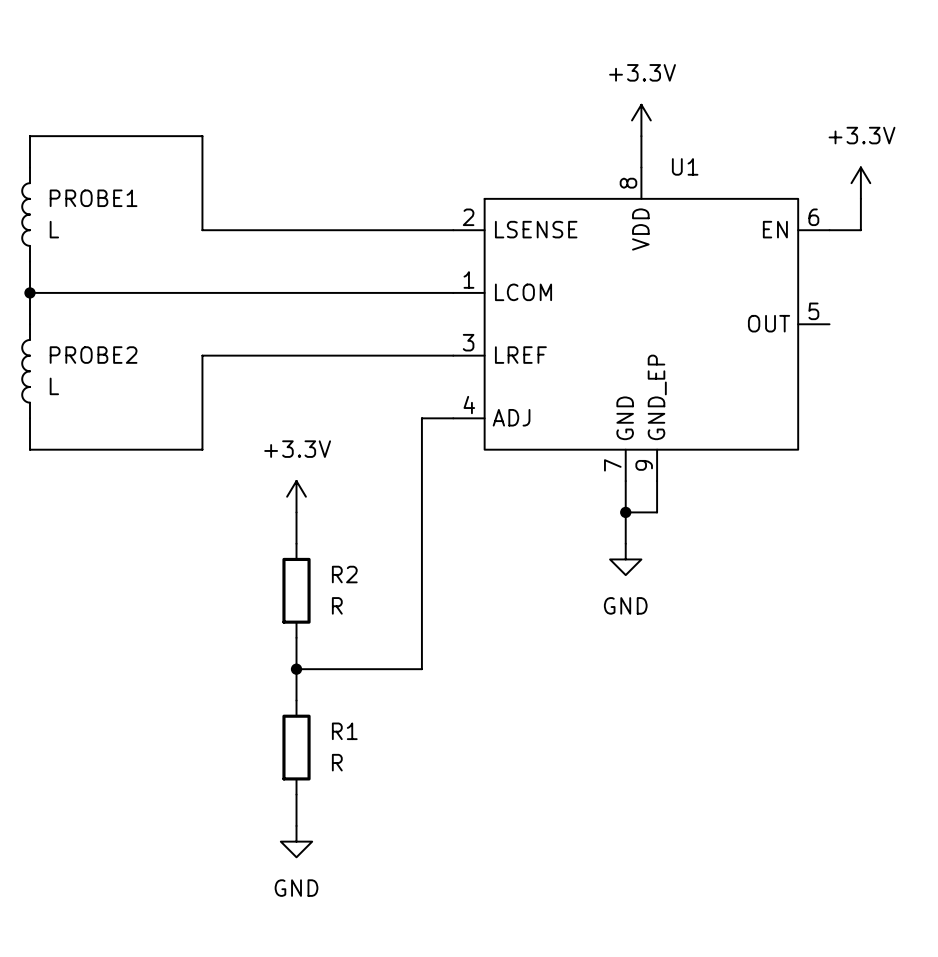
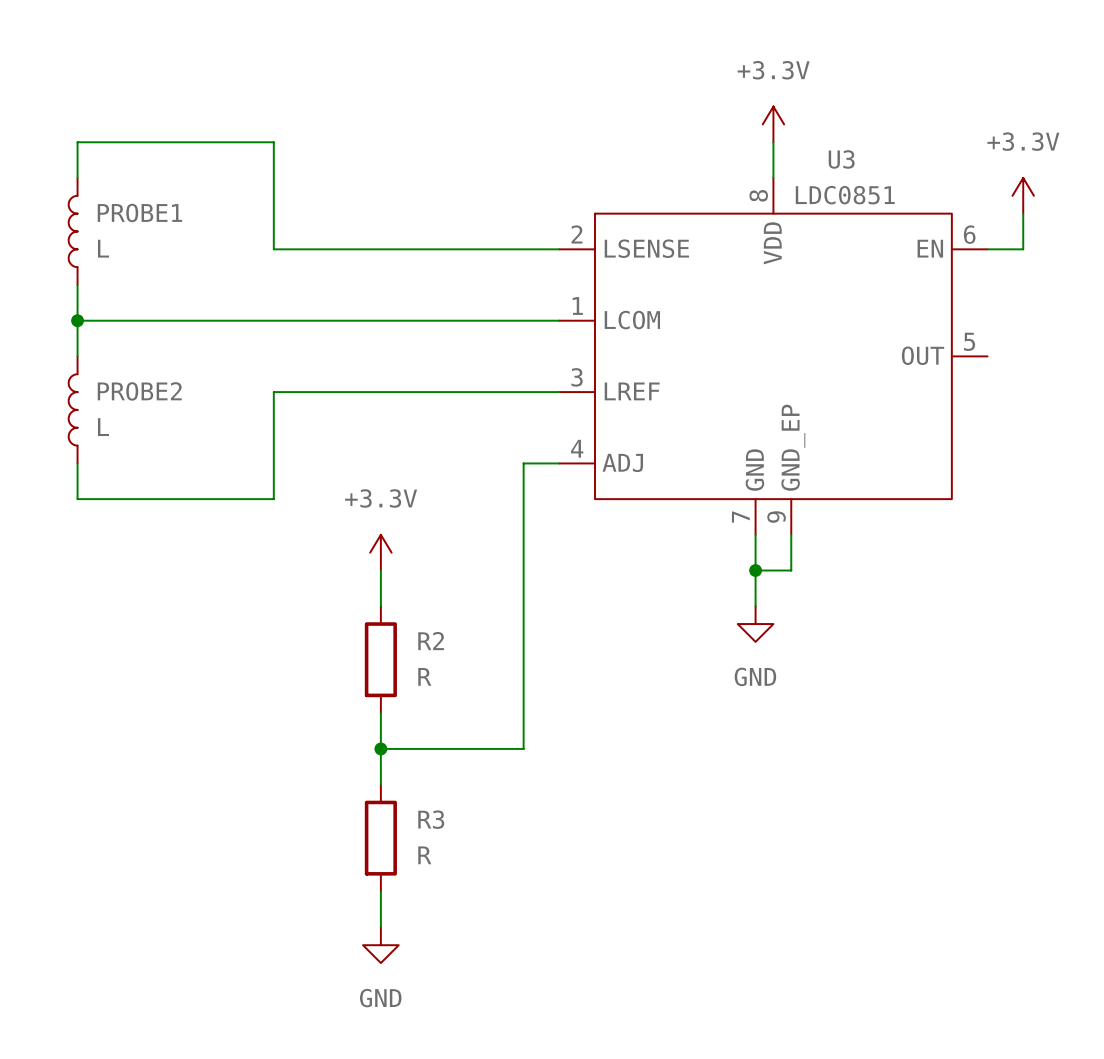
U1 name: U1 (685, 166) -> U3 (841, 159)
U1 value: none -> LDC0851 (845, 195)
R1 name: R1 (344, 731) -> R3 (431, 819)

